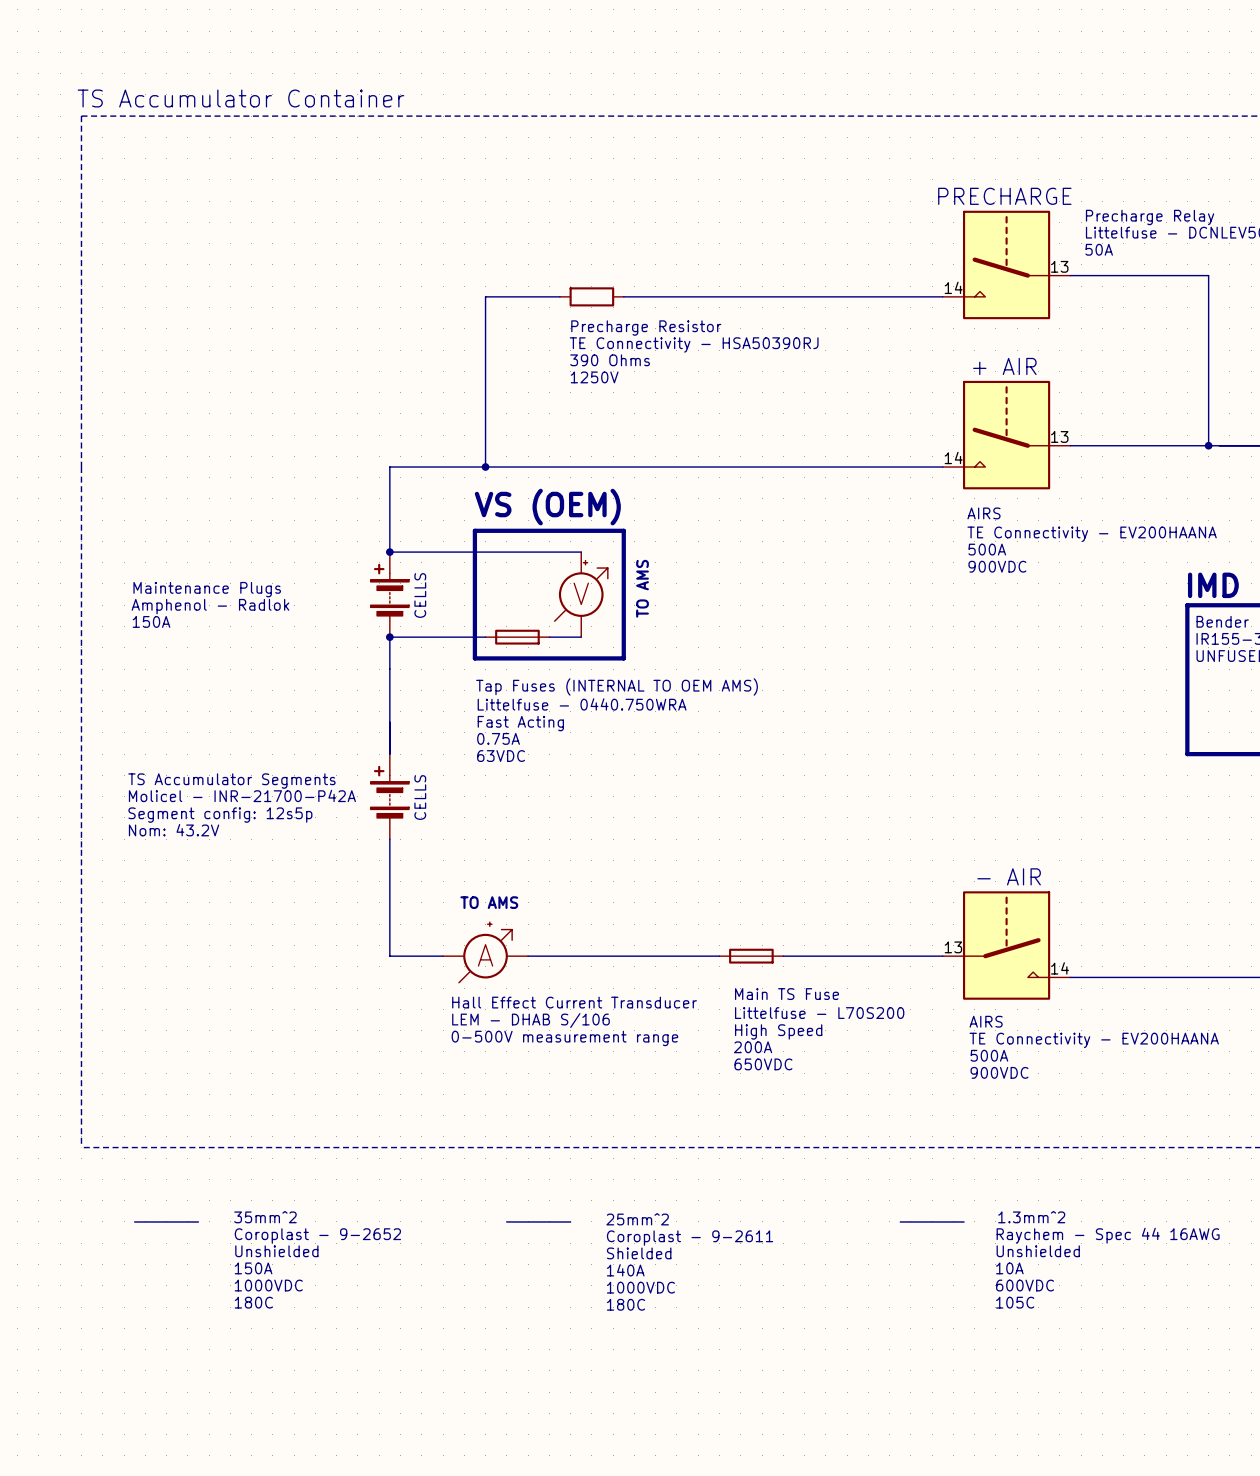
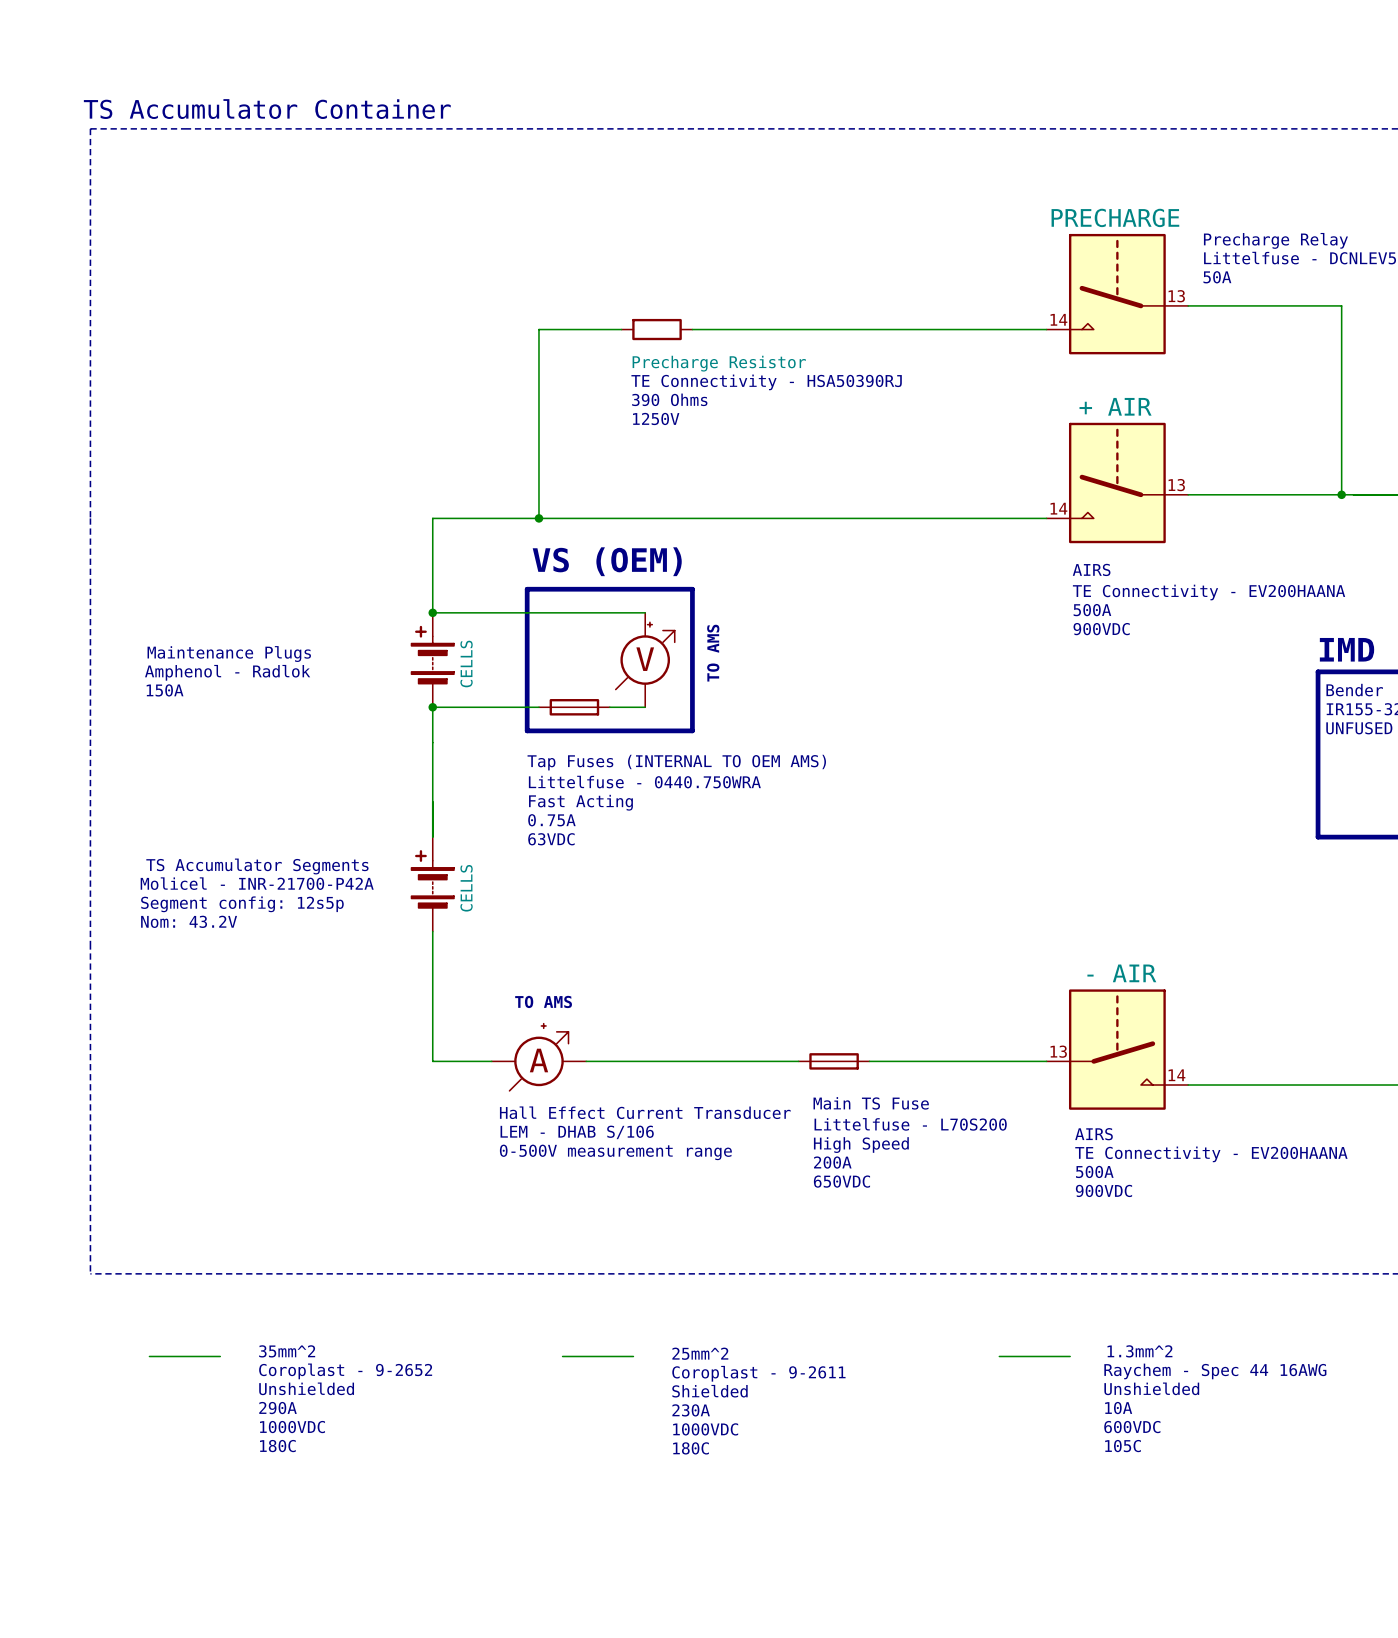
text: 150A (253, 1268) -> 290A (278, 1408)
text: 140A (625, 1270) -> 230A (691, 1410)

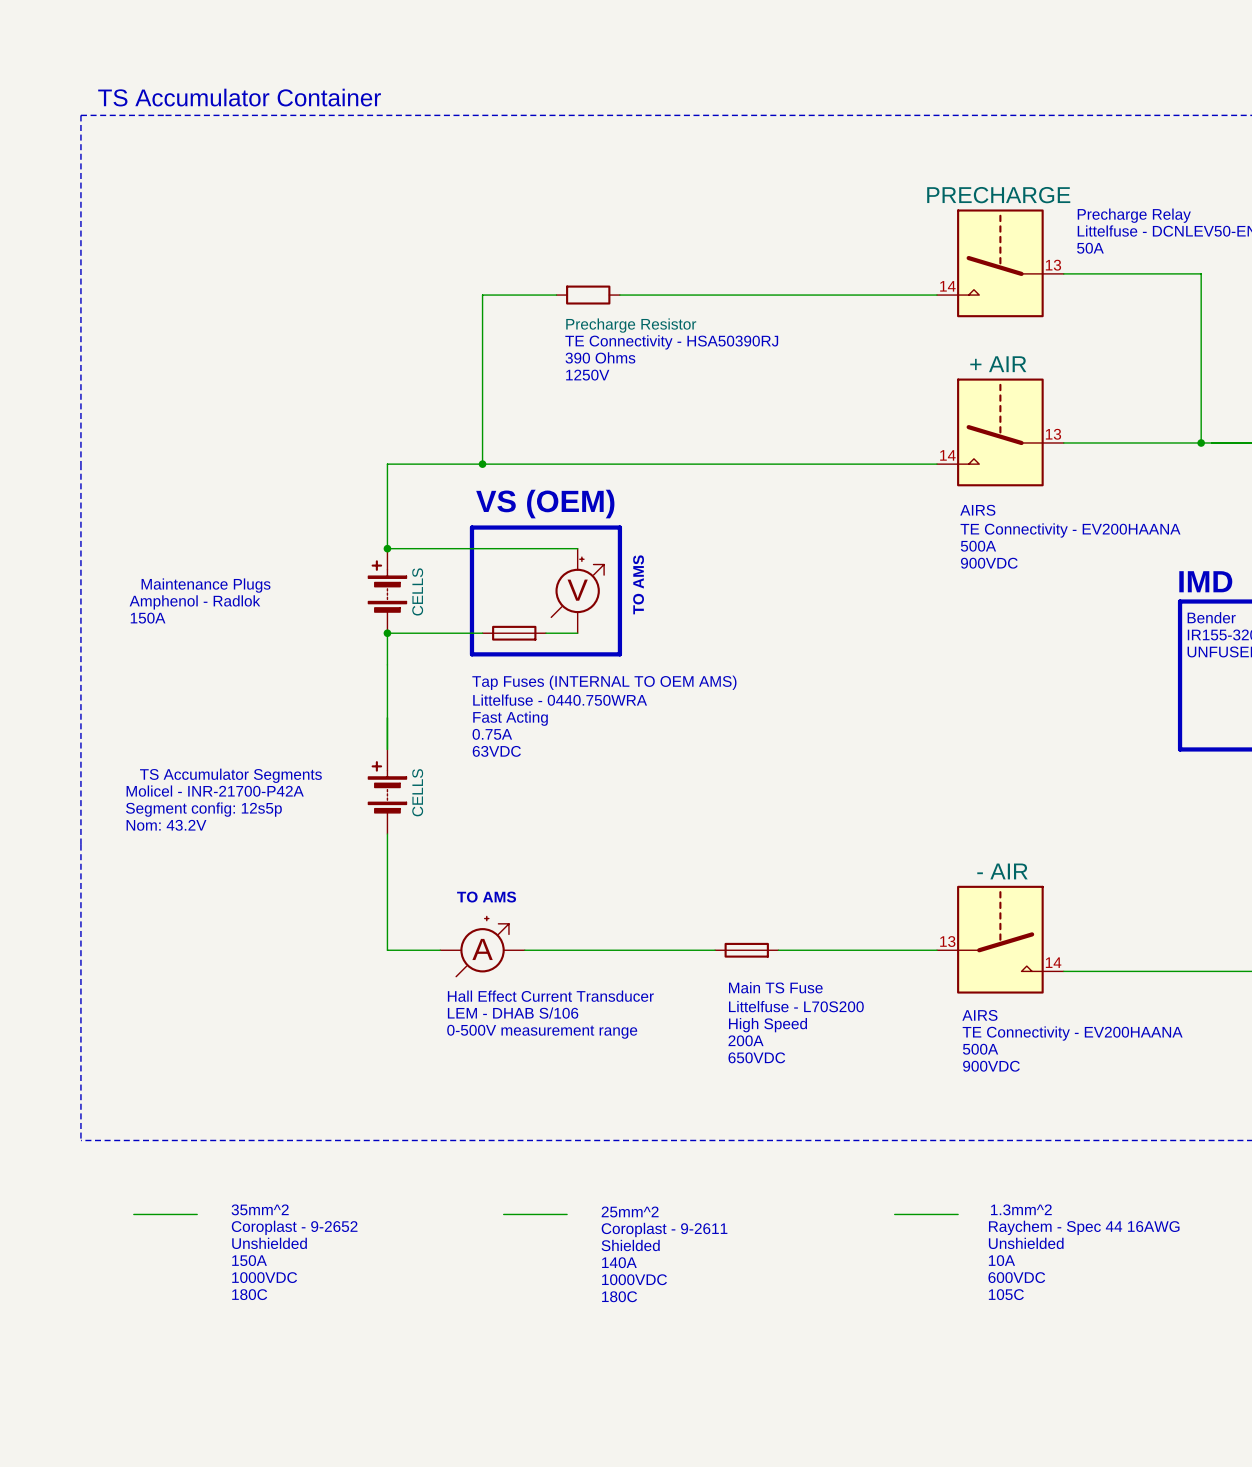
text: 290A (278, 1408) -> 150A (249, 1260)
text: 230A (691, 1410) -> 140A (619, 1262)

